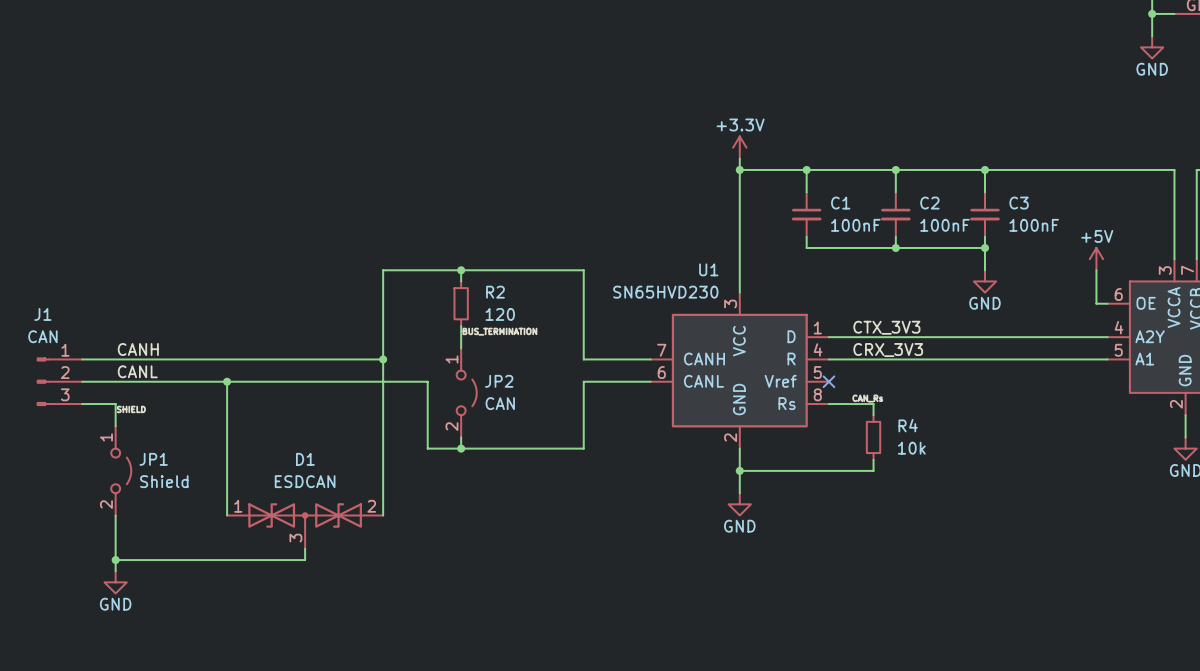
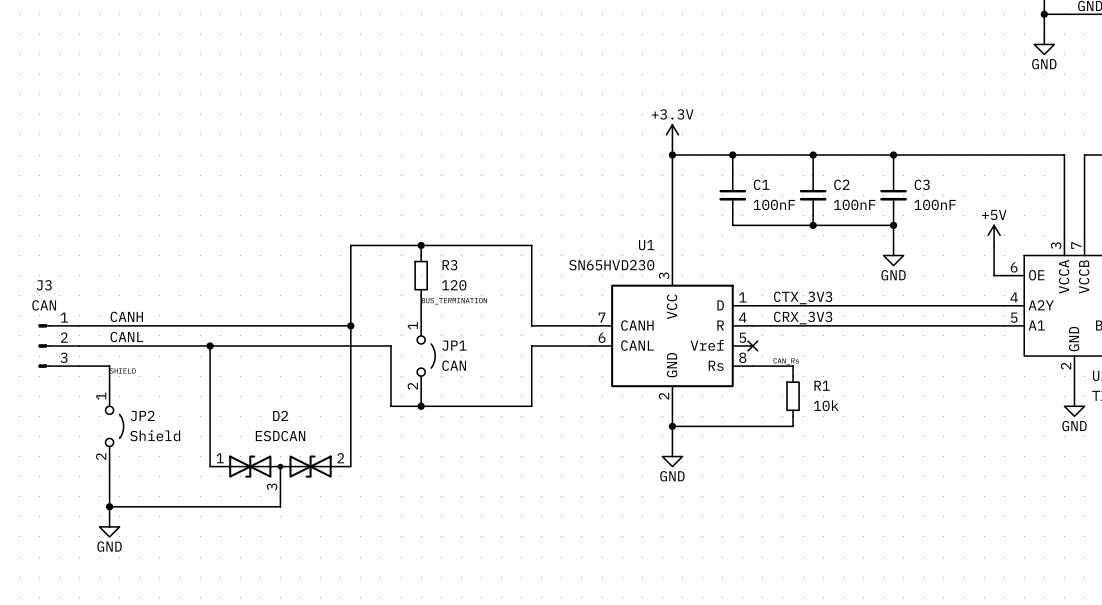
R2 name: R2 (495, 292) -> R3 (449, 265)
J1 name: J1 (42, 314) -> J3 (44, 285)
JP2 name: JP2 (499, 381) -> JP1 (454, 345)
R4 name: R4 (908, 425) -> R1 (822, 385)
JP1 name: JP1 (153, 459) -> JP2 (142, 415)
D1 name: D1 (305, 459) -> D2 (280, 415)

